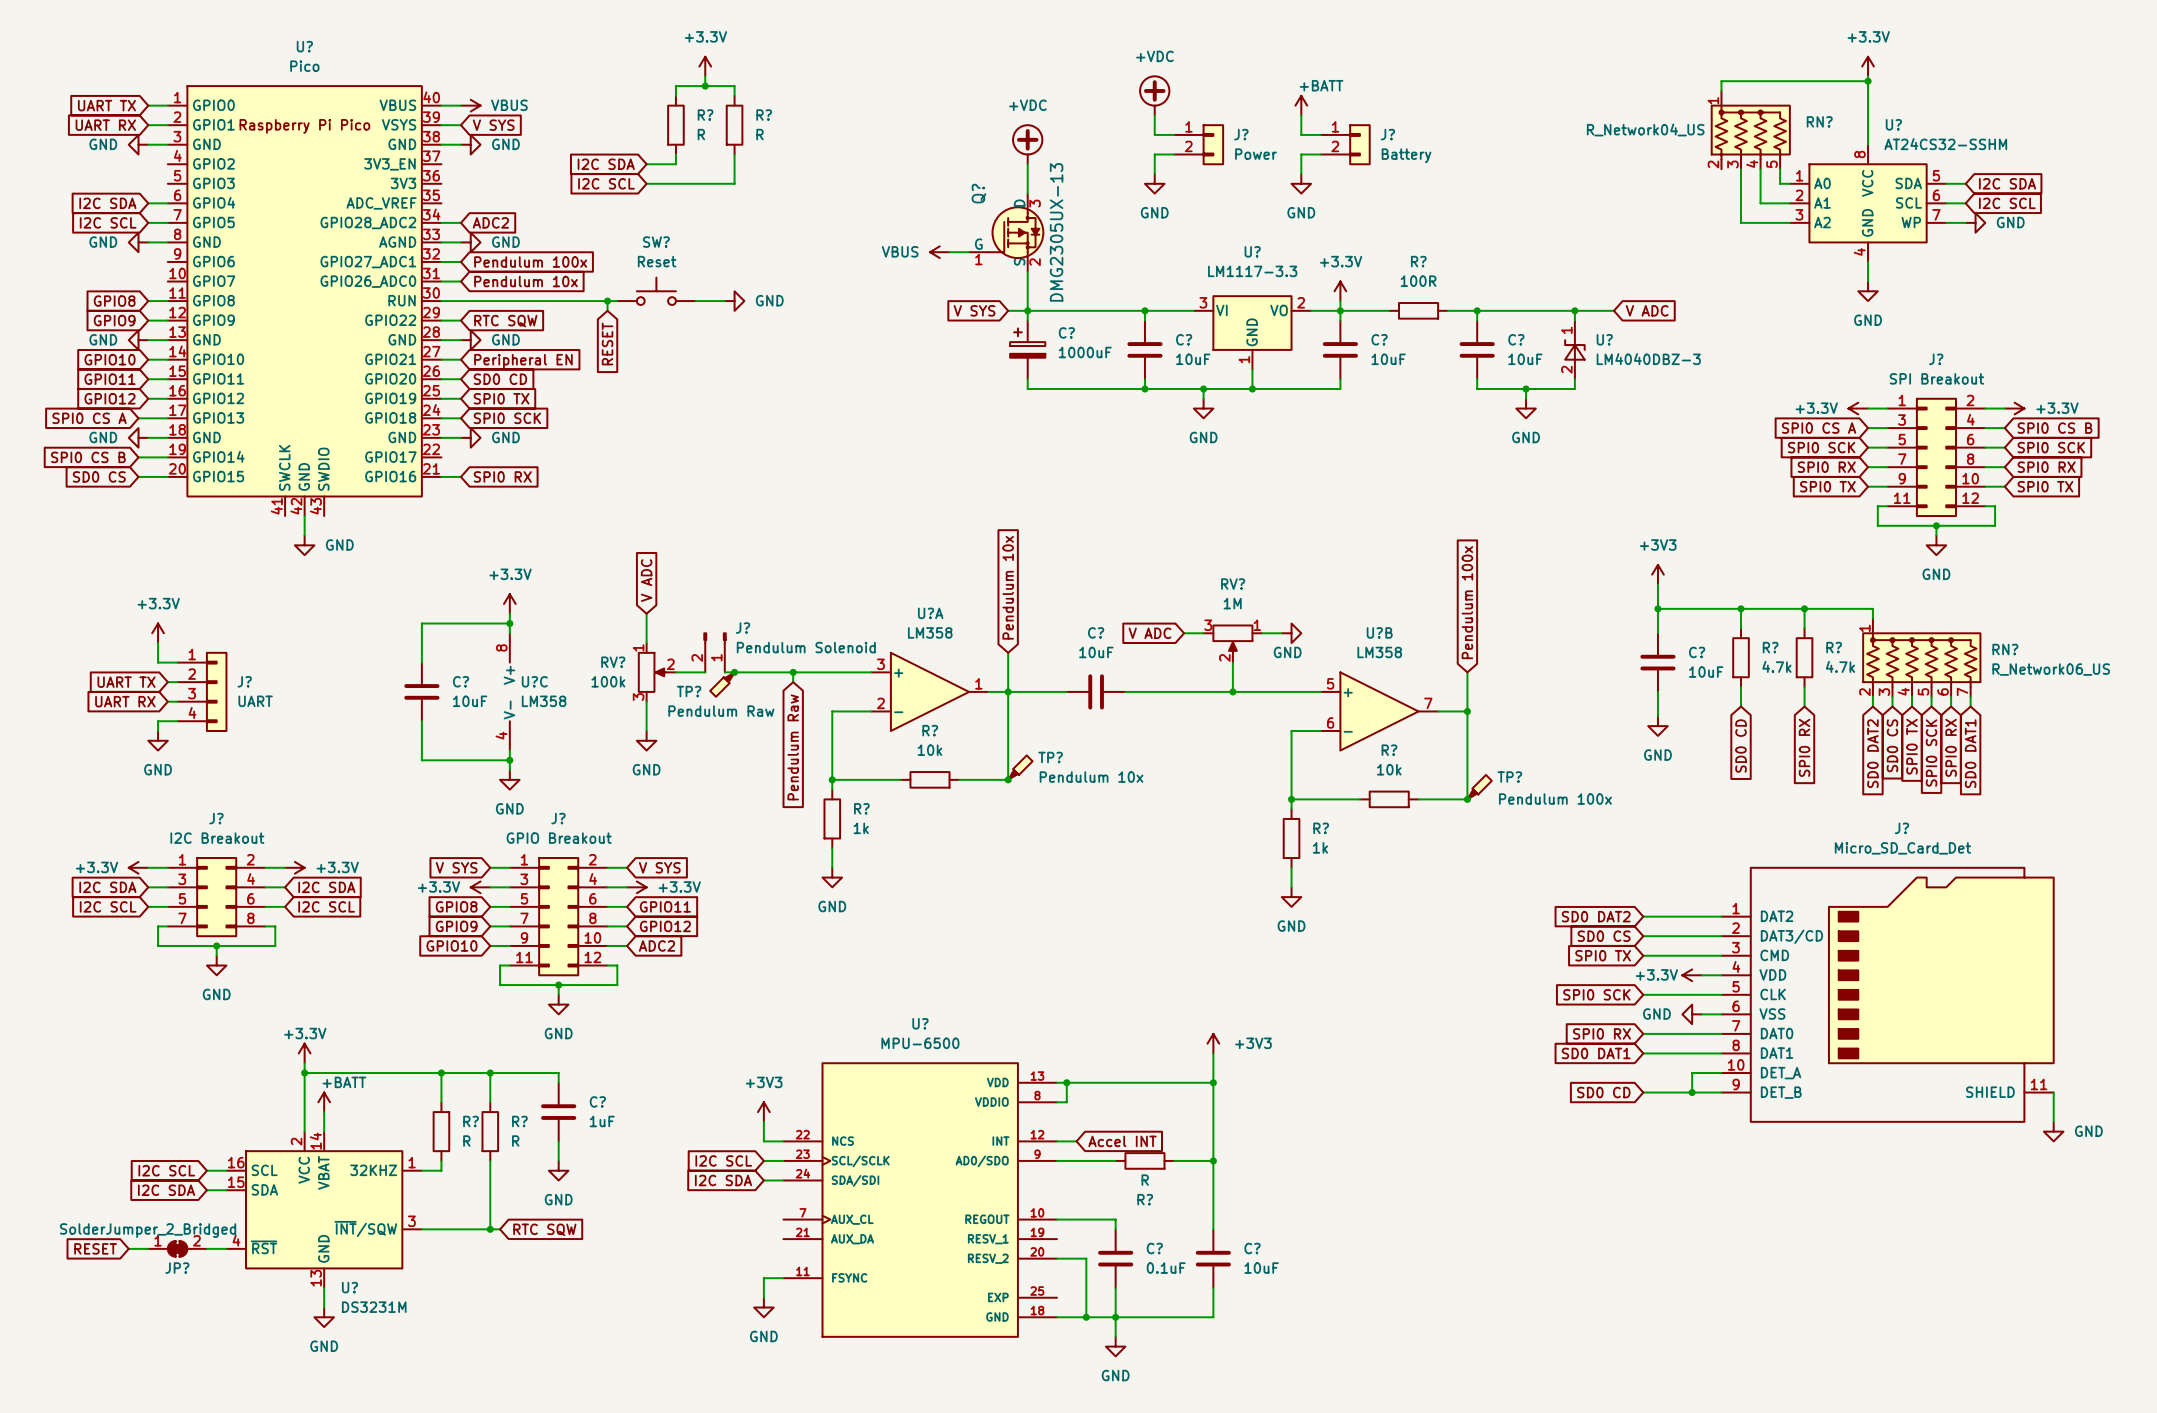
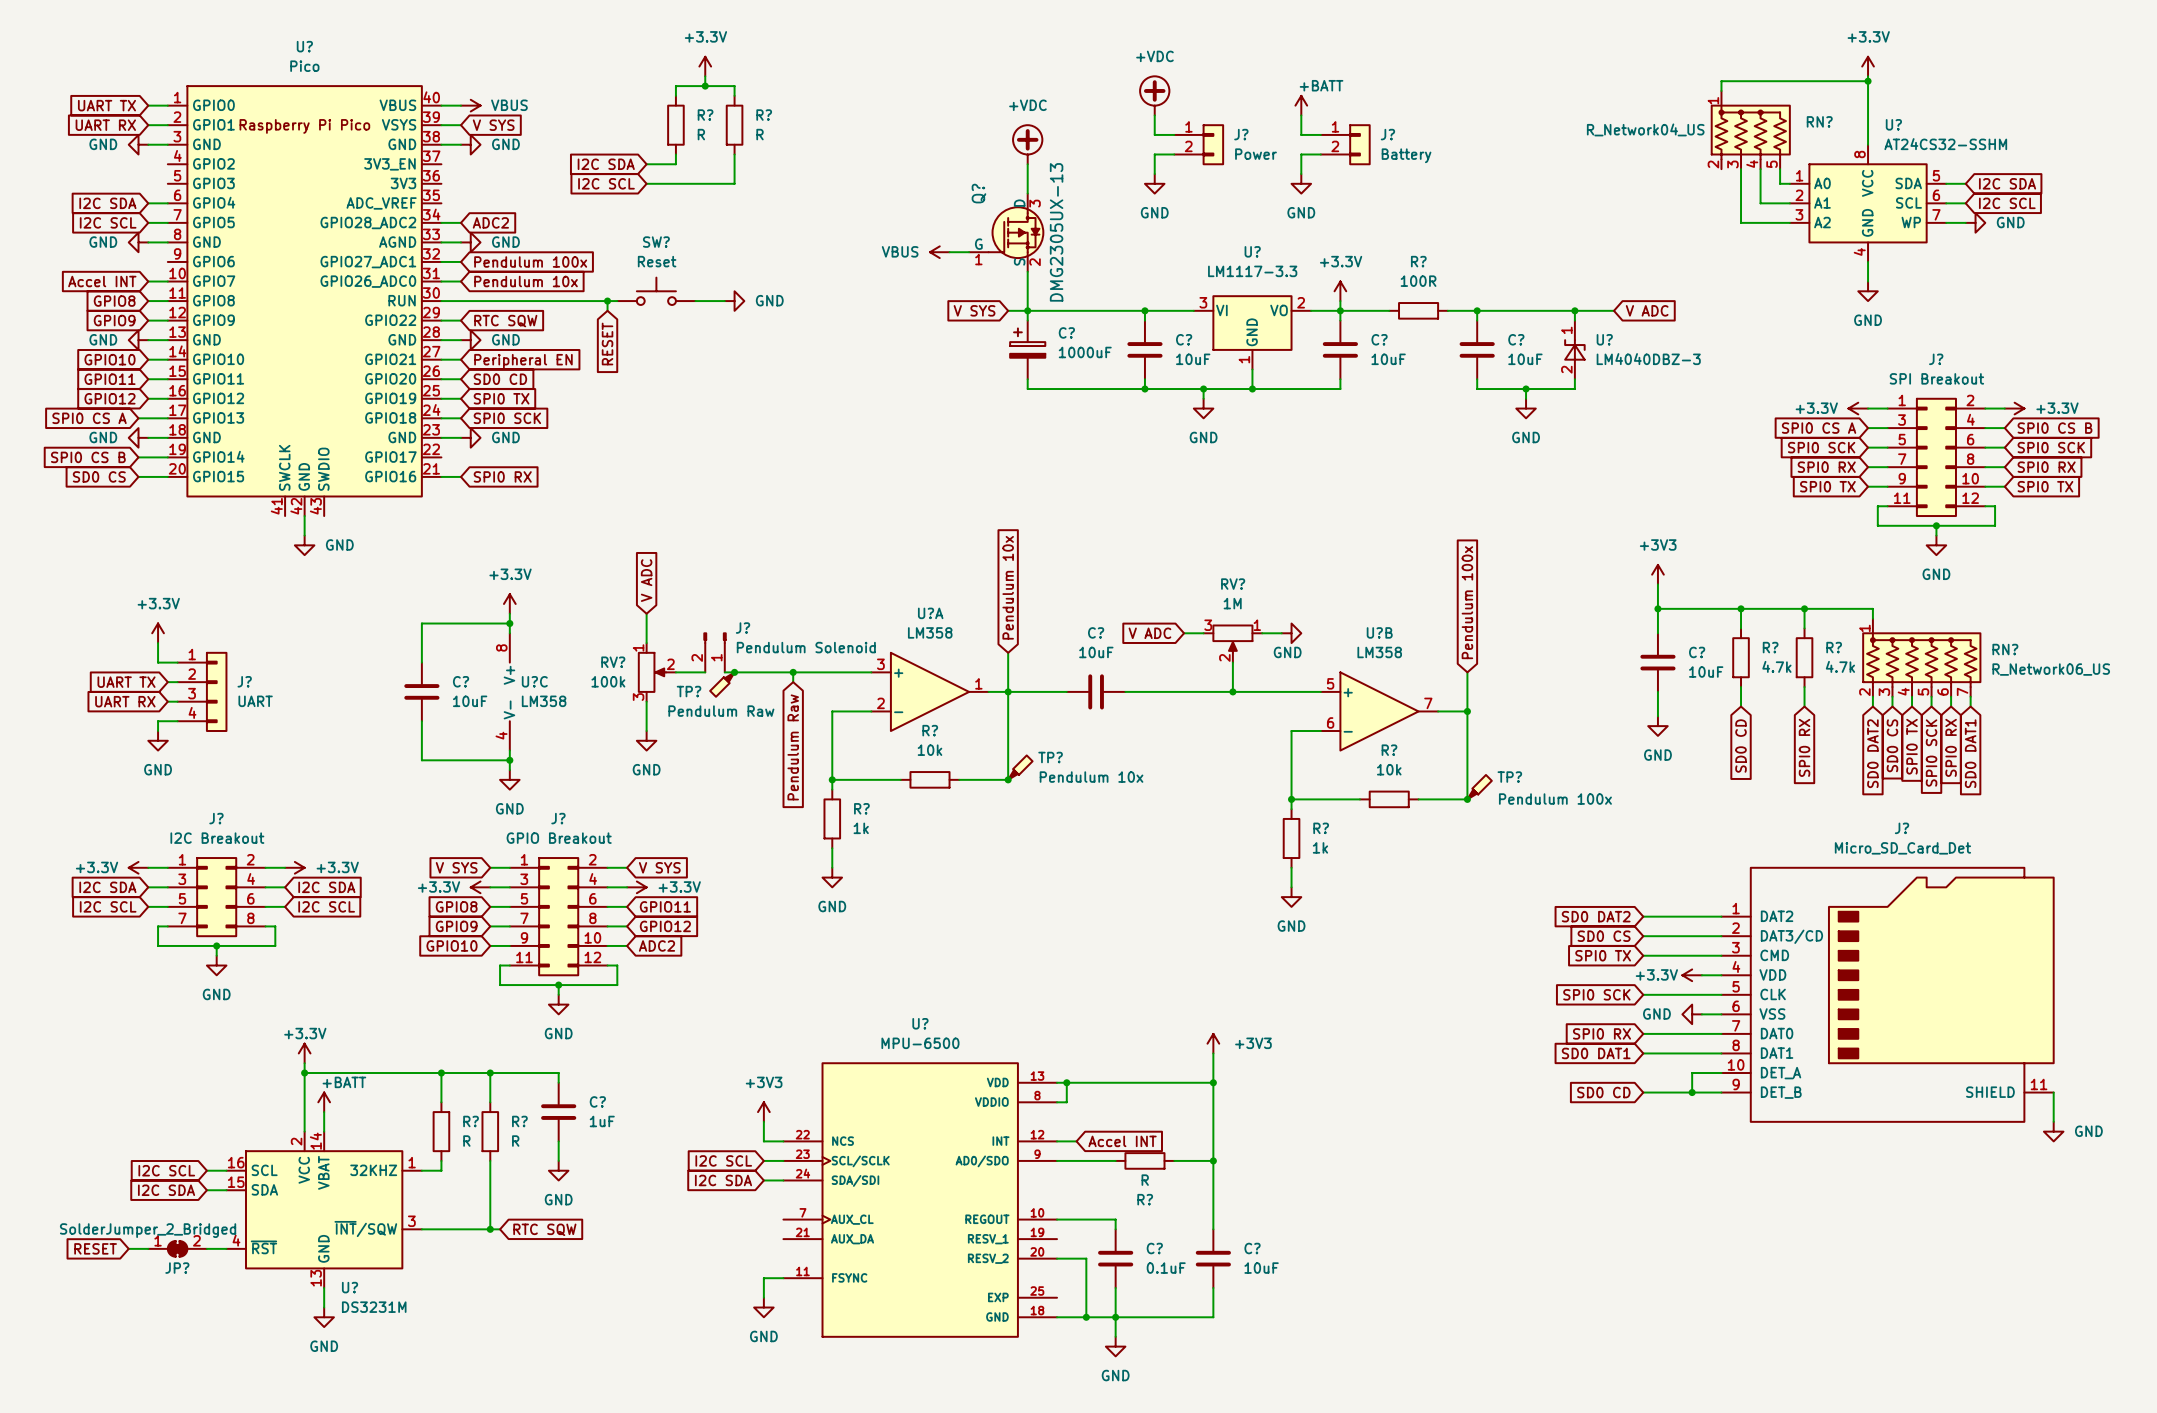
global label: none -> Accel INT (102, 281)
wire: none -> (148, 281) (167, 281)

